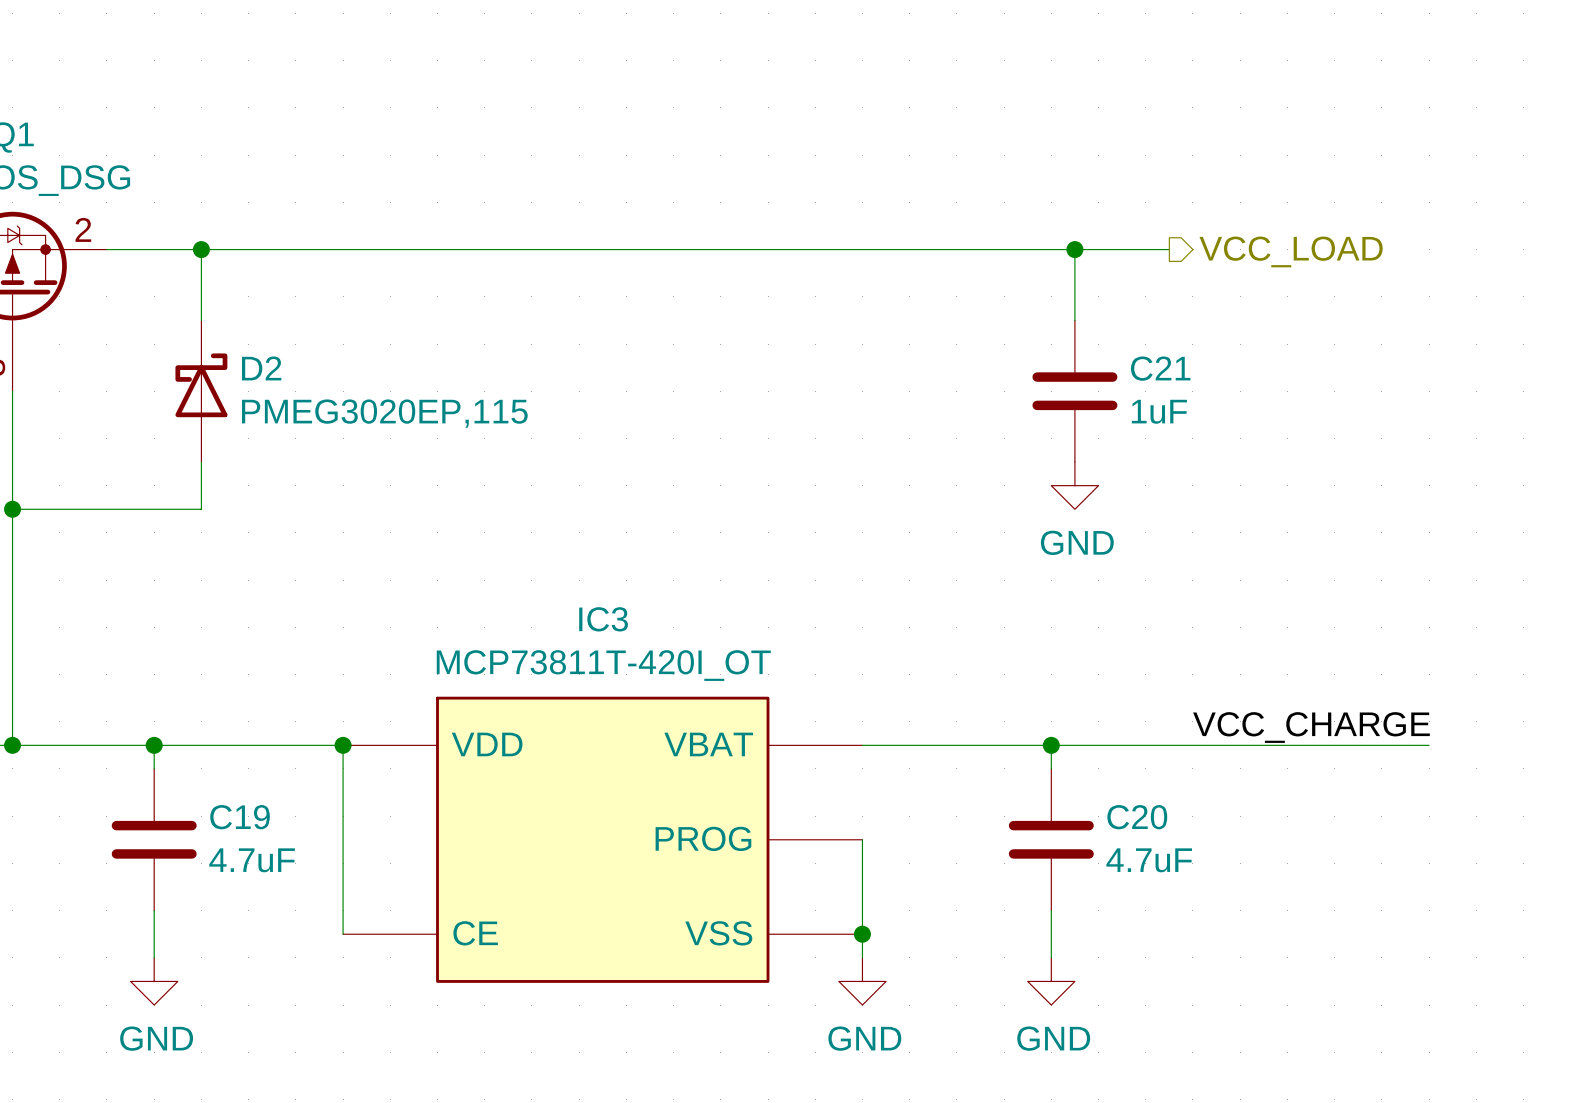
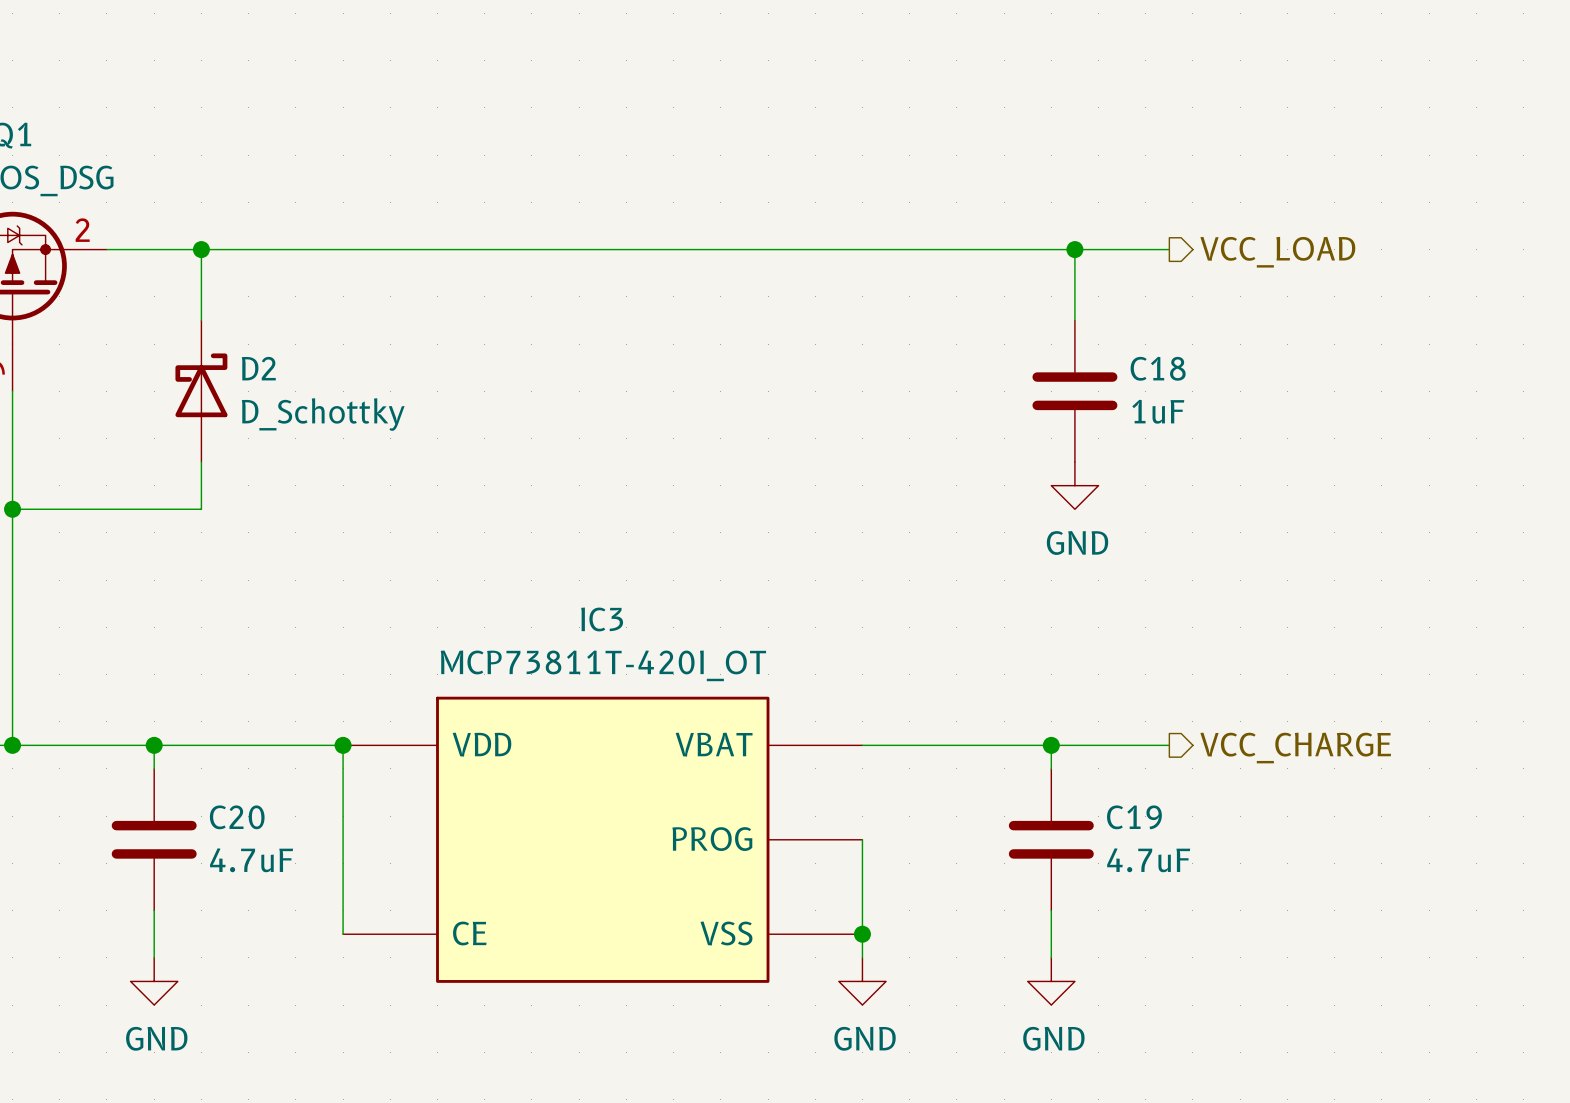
C21 name: C21 (1160, 368) -> C18 (1158, 368)
D2 value: PMEG3020EP,115 (384, 413) -> D_Schottky (323, 414)
label: VCC_CHARGE (1311, 727) -> none
wire: (1169, 745) (1429, 745) -> none
hierarchical label: none -> VCC_CHARGE (1295, 748)
C19 name: C19 (240, 817) -> C20 (237, 817)
C20 name: C20 (1137, 817) -> C19 (1134, 817)

